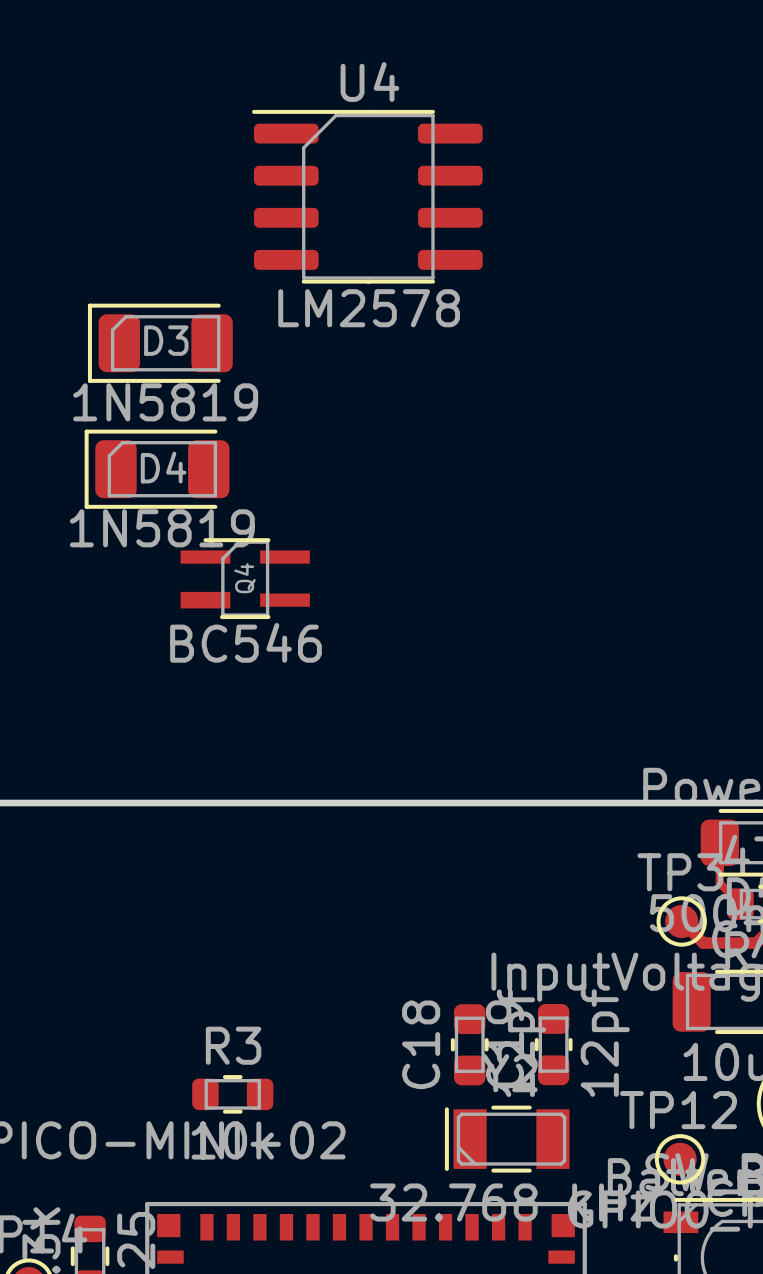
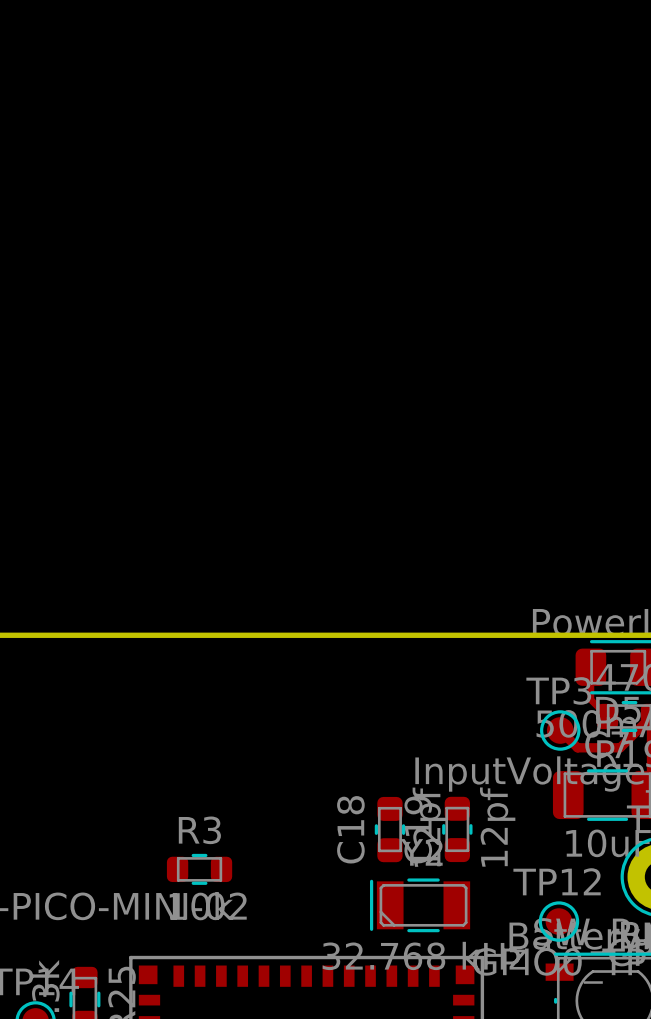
U4: LM2578 (367, 196) -> none
D3: 1N5819 (160, 343) -> none
D4: 1N5819 (157, 469) -> none
Q4: BC546 (245, 578) -> none

